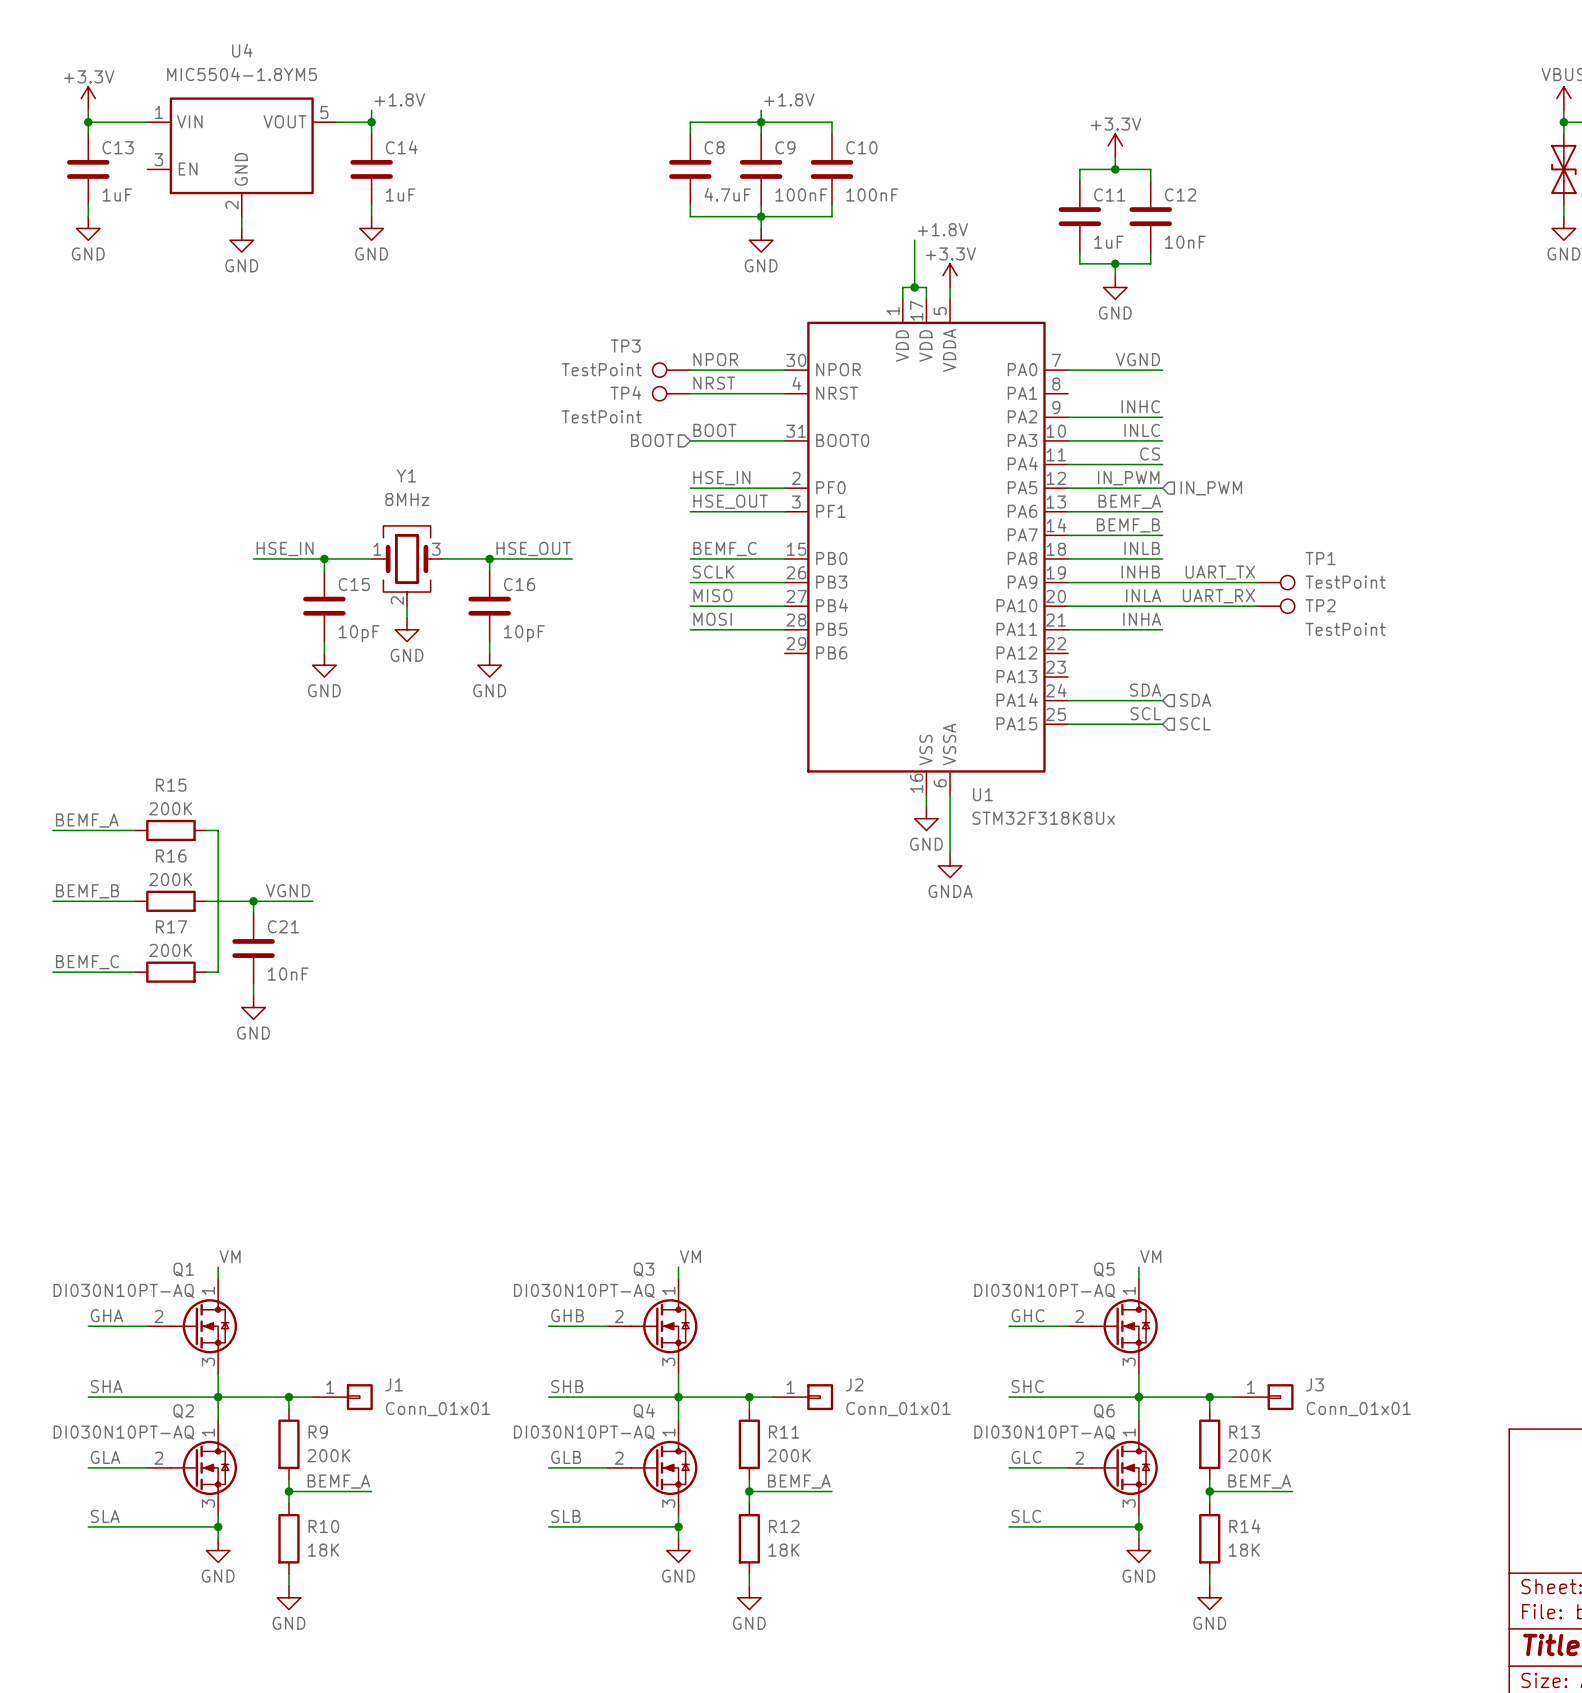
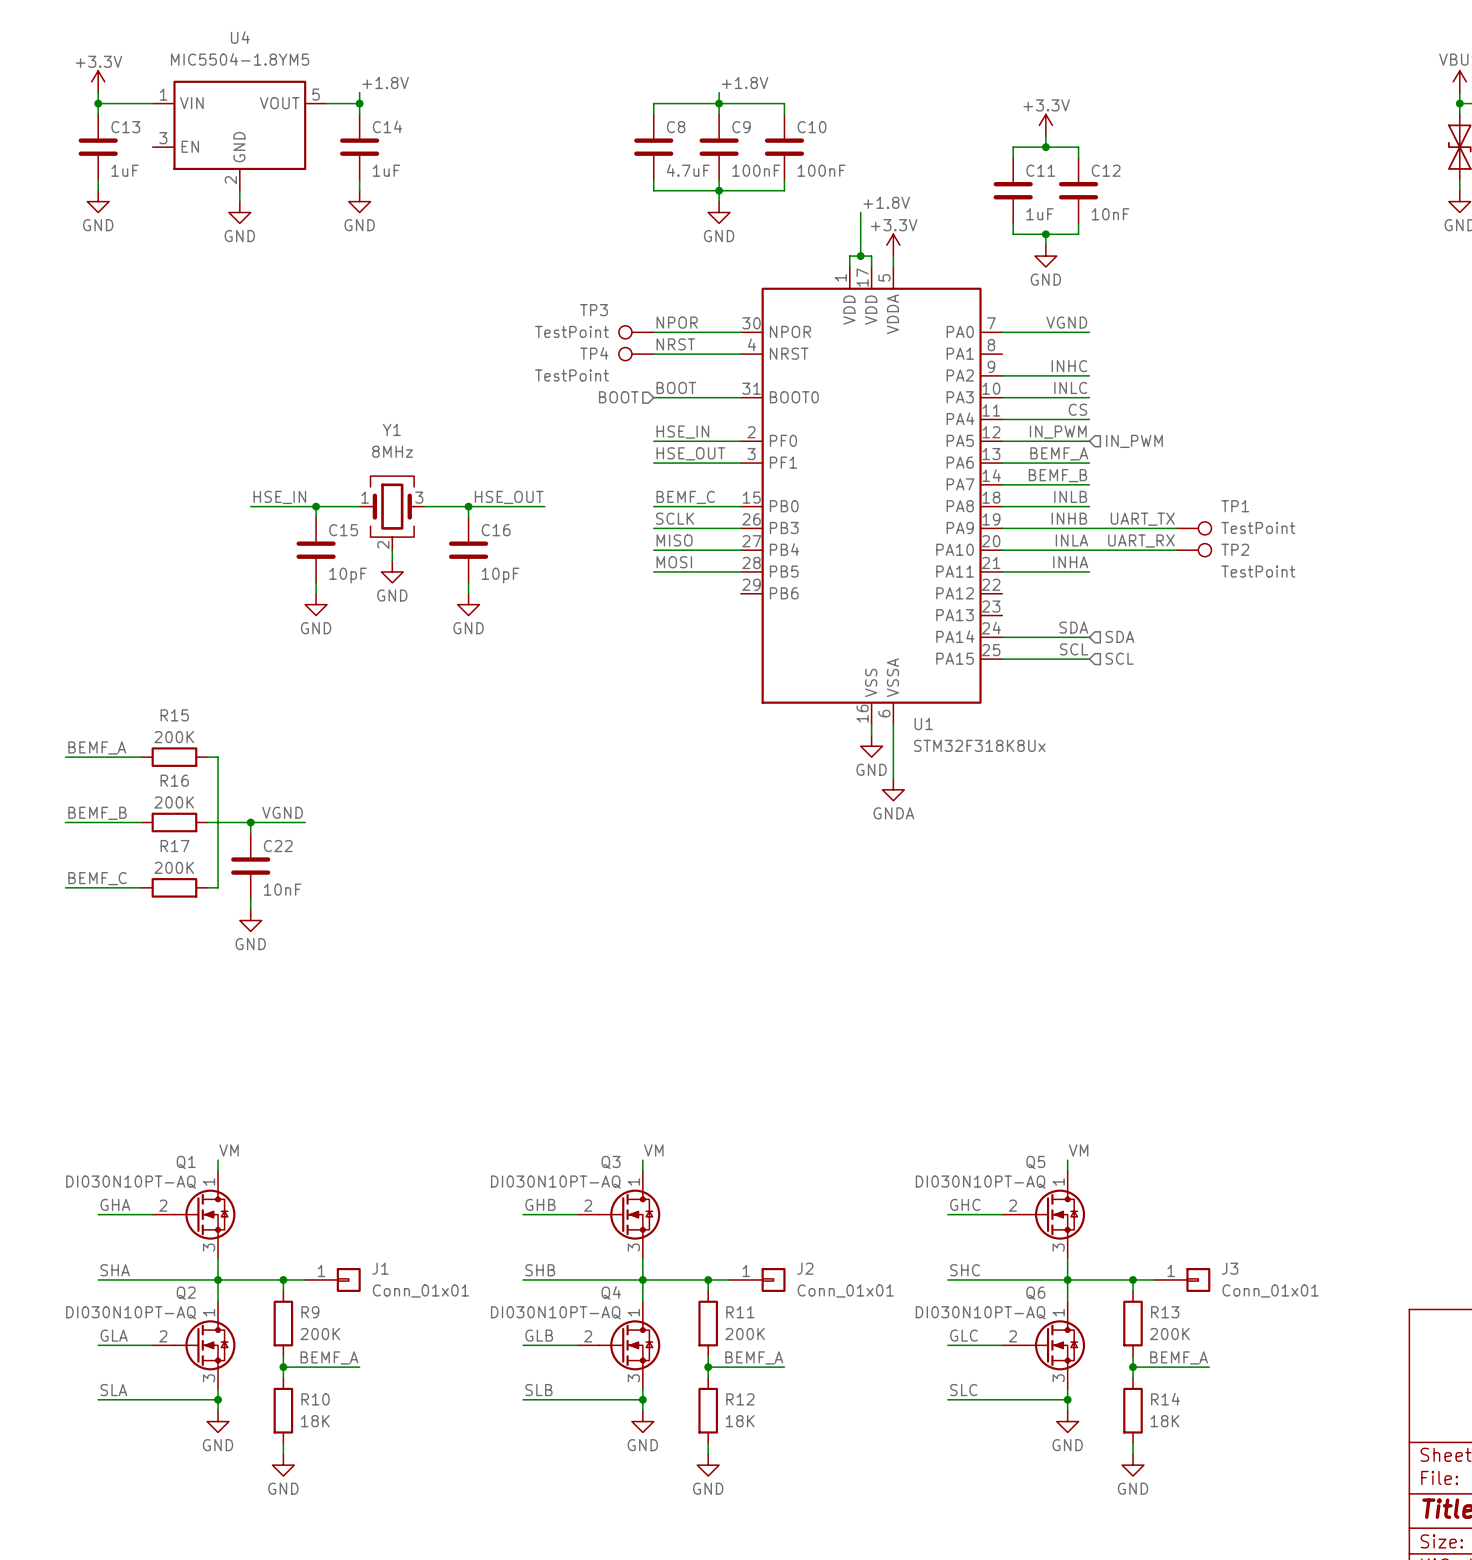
C21 name: C21 (283, 926) -> C22 (278, 846)

